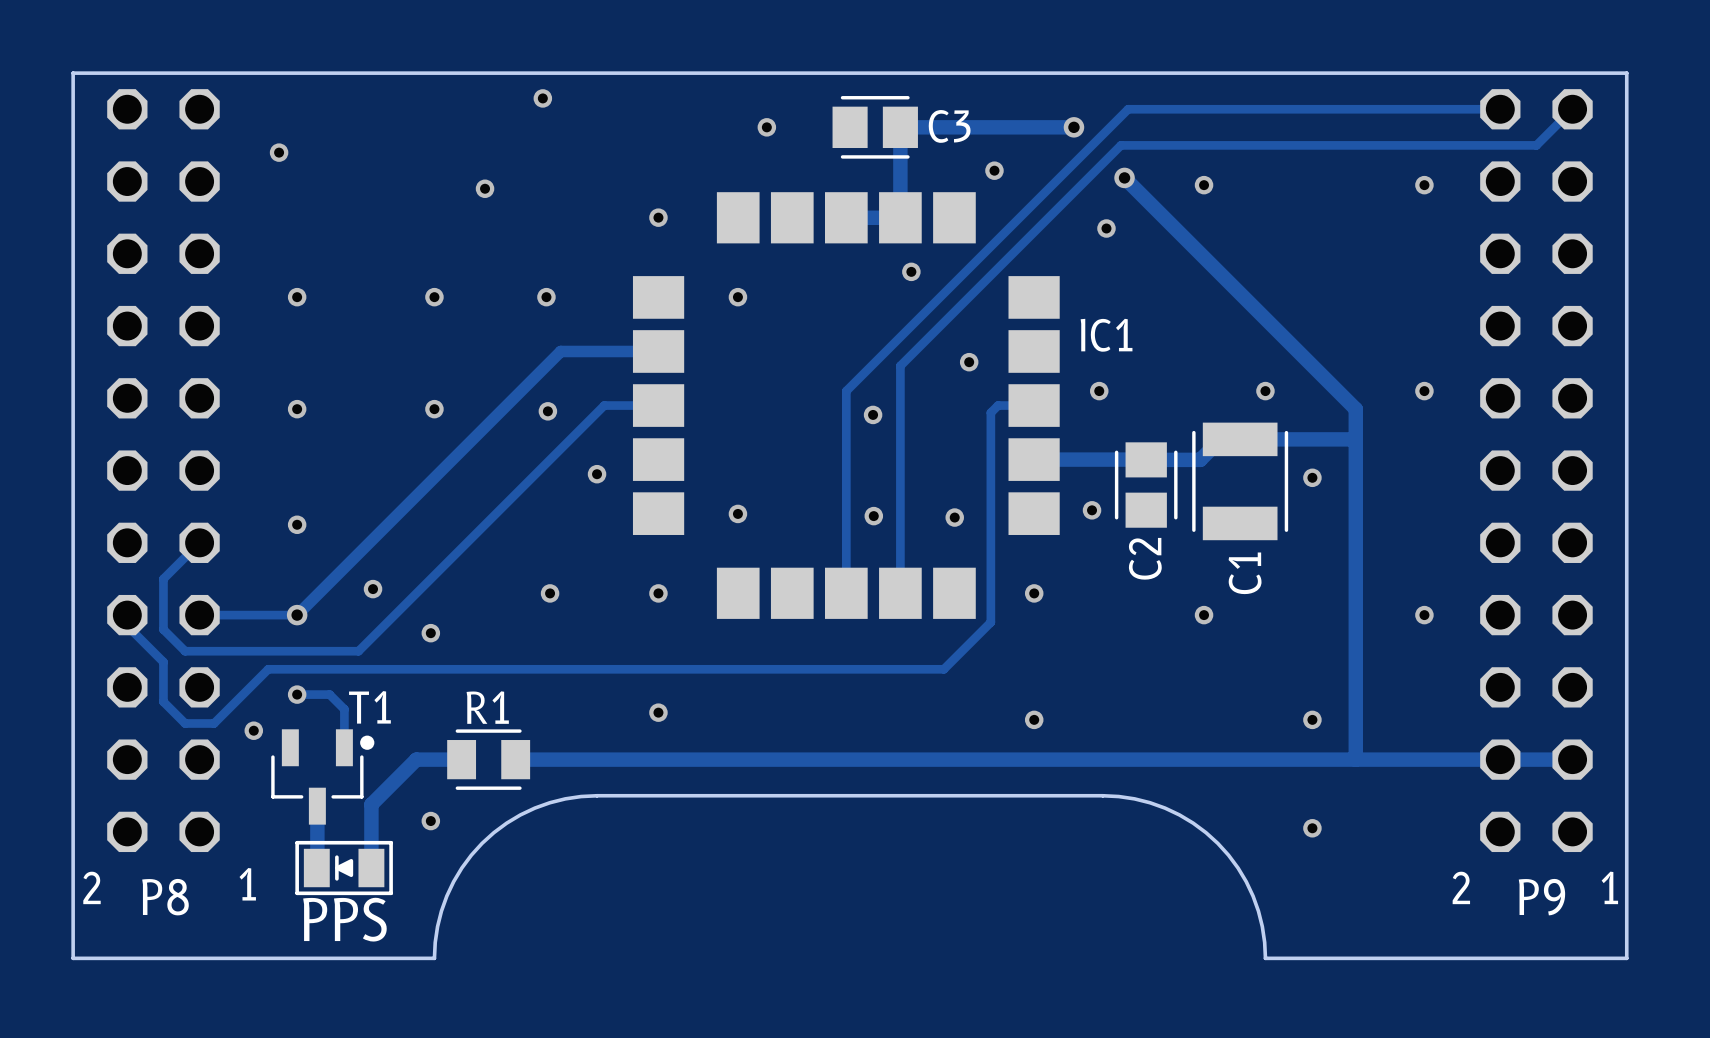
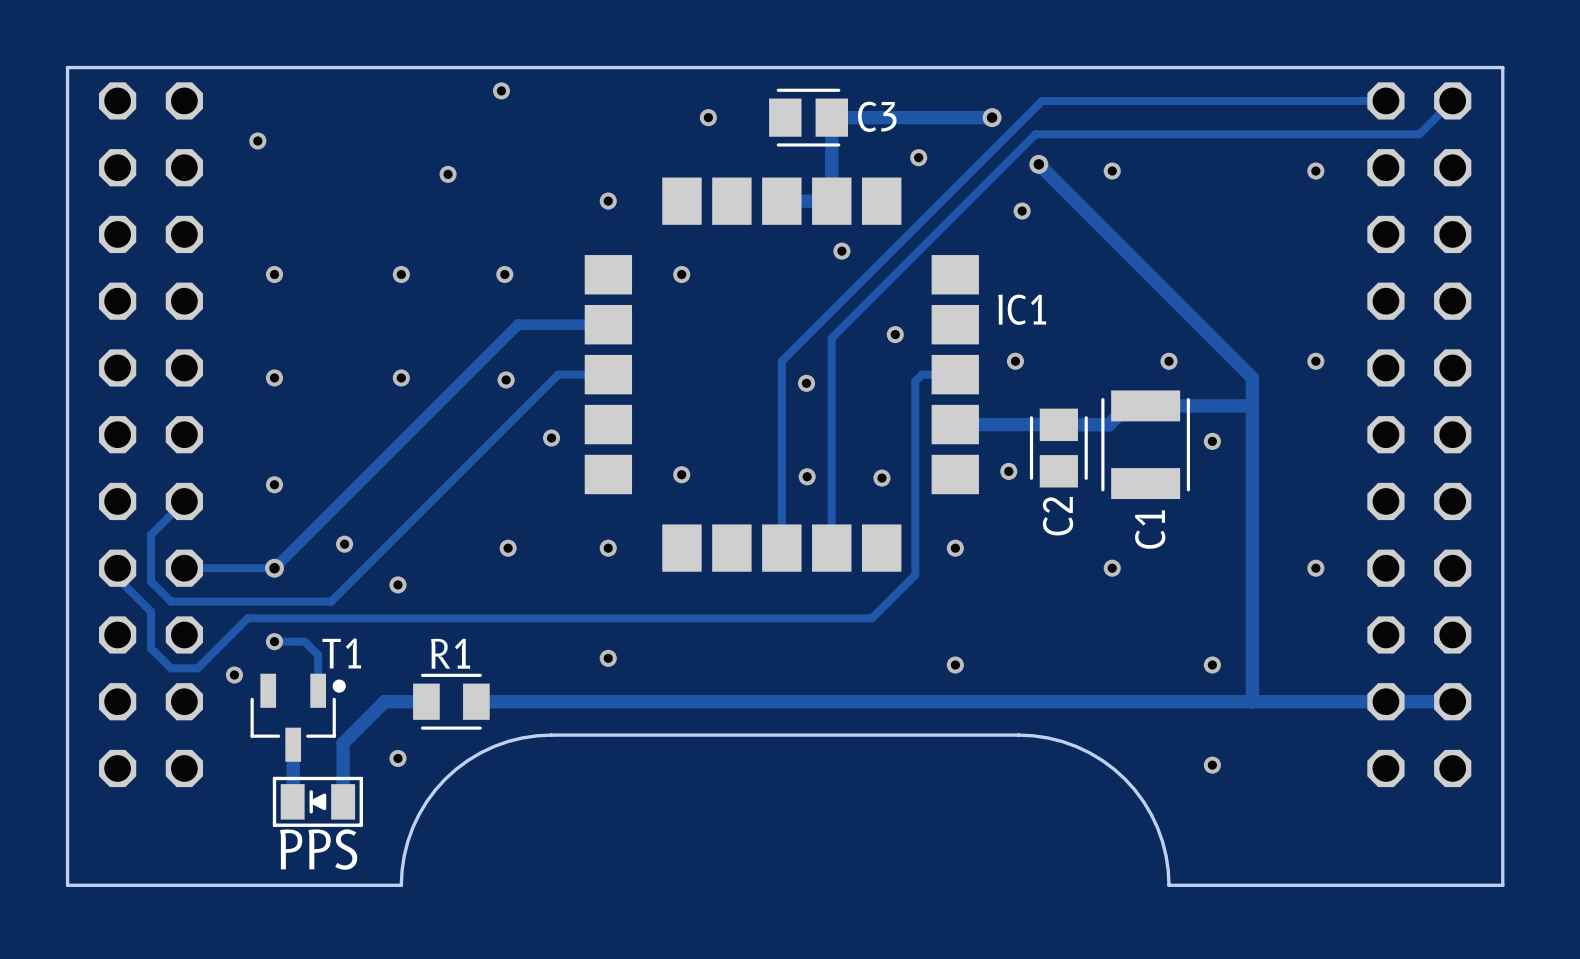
P8: (163, 470) -> none
P9: (1536, 470) -> none
text: 1 (247, 884) -> none
text: 2 (91, 887) -> none
text: 2 (1461, 887) -> none
text: 1 (1609, 887) -> none

